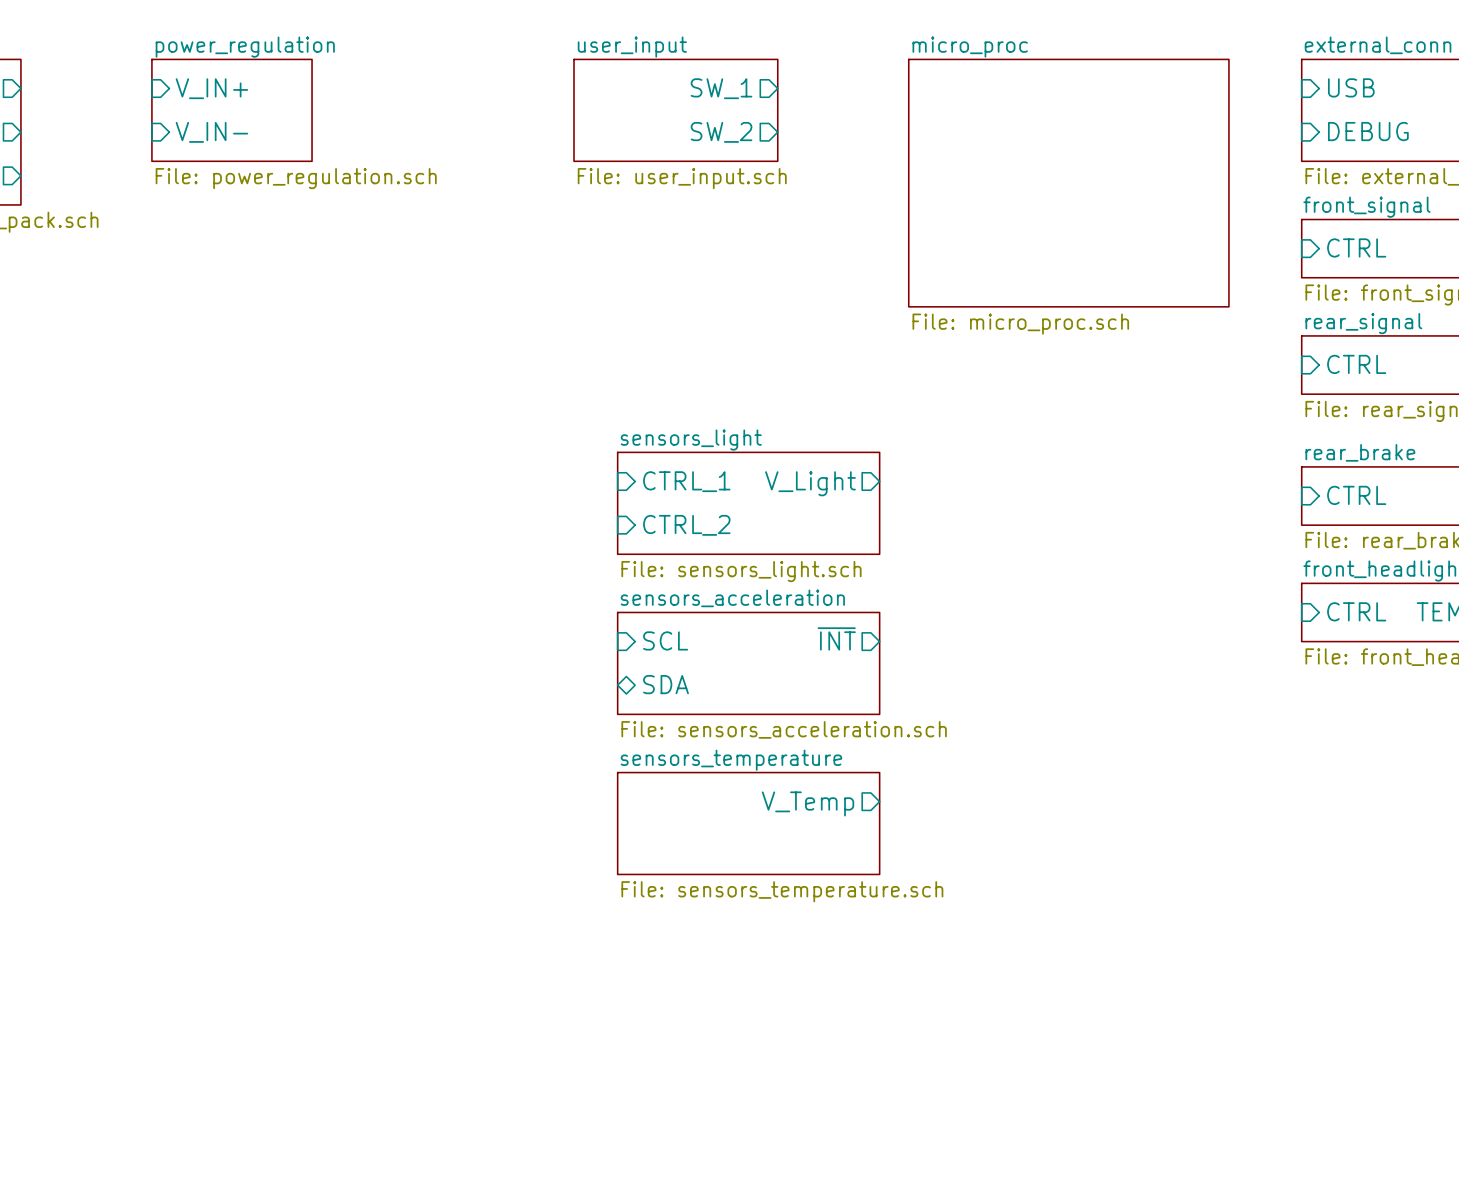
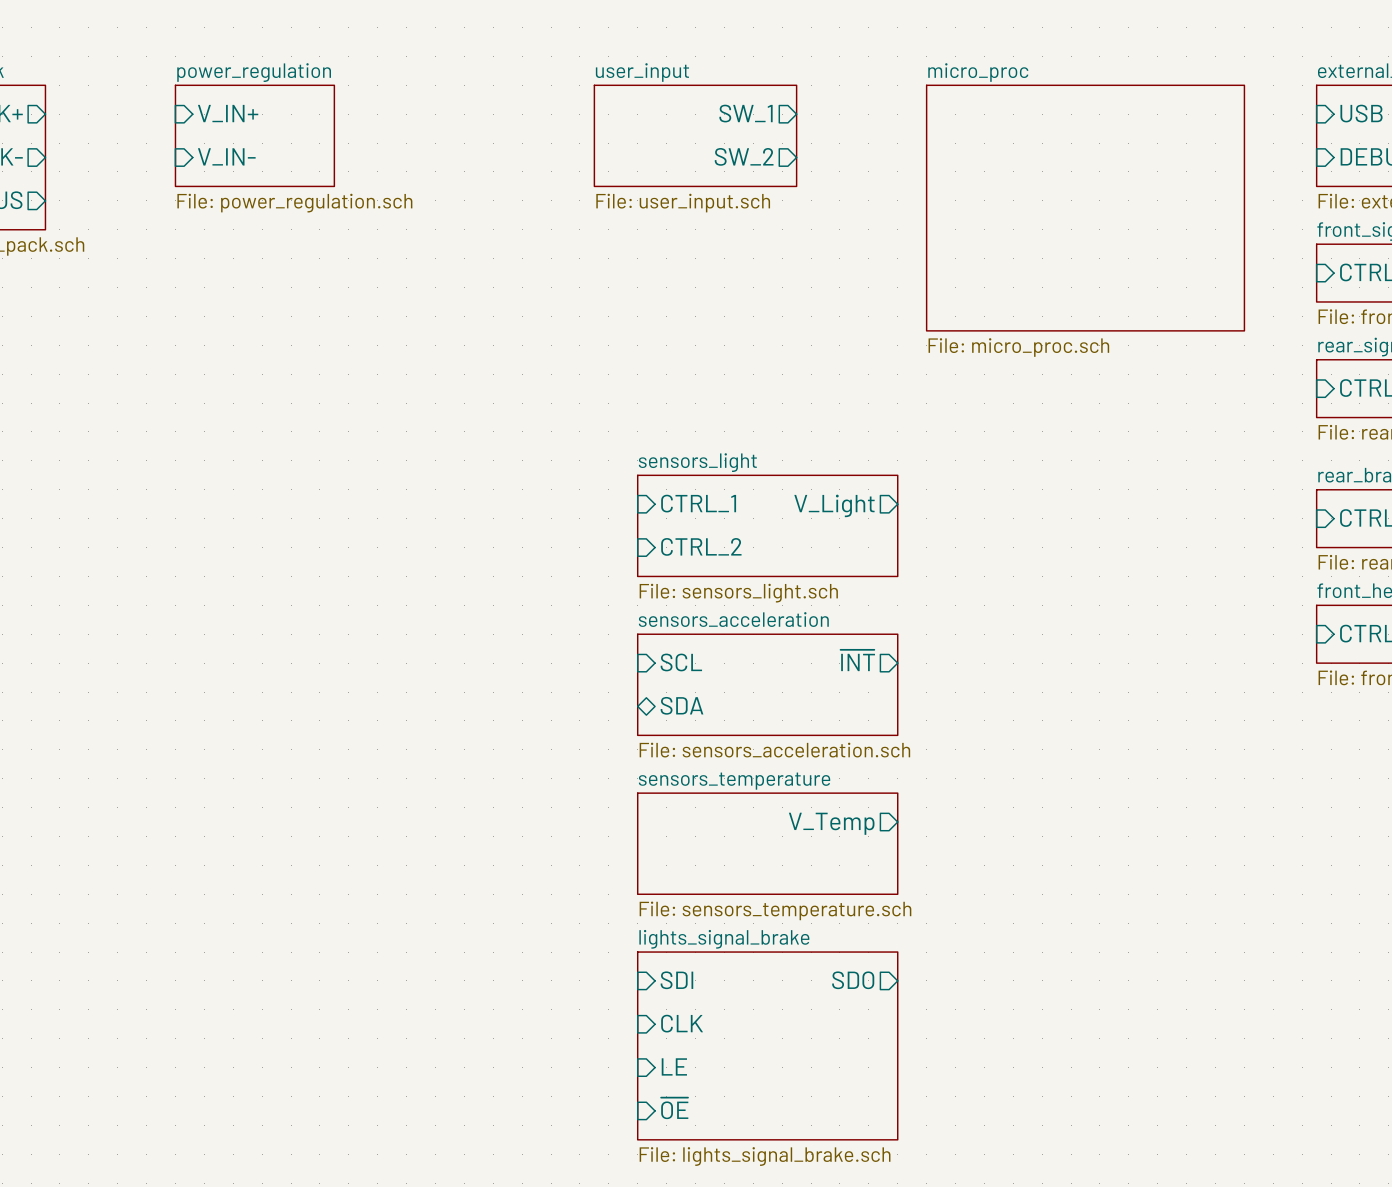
sheet pin: none -> SDI (676, 980)
sheet pin: none -> SDO (853, 980)
sheet pin: none -> CLK (682, 1023)
sheet lights_signal_brake: none -> File: lights_signal_brake.sch (767, 1045)
sheet pin: none -> LE (674, 1066)
sheet pin: none -> ~{OE} (674, 1108)

